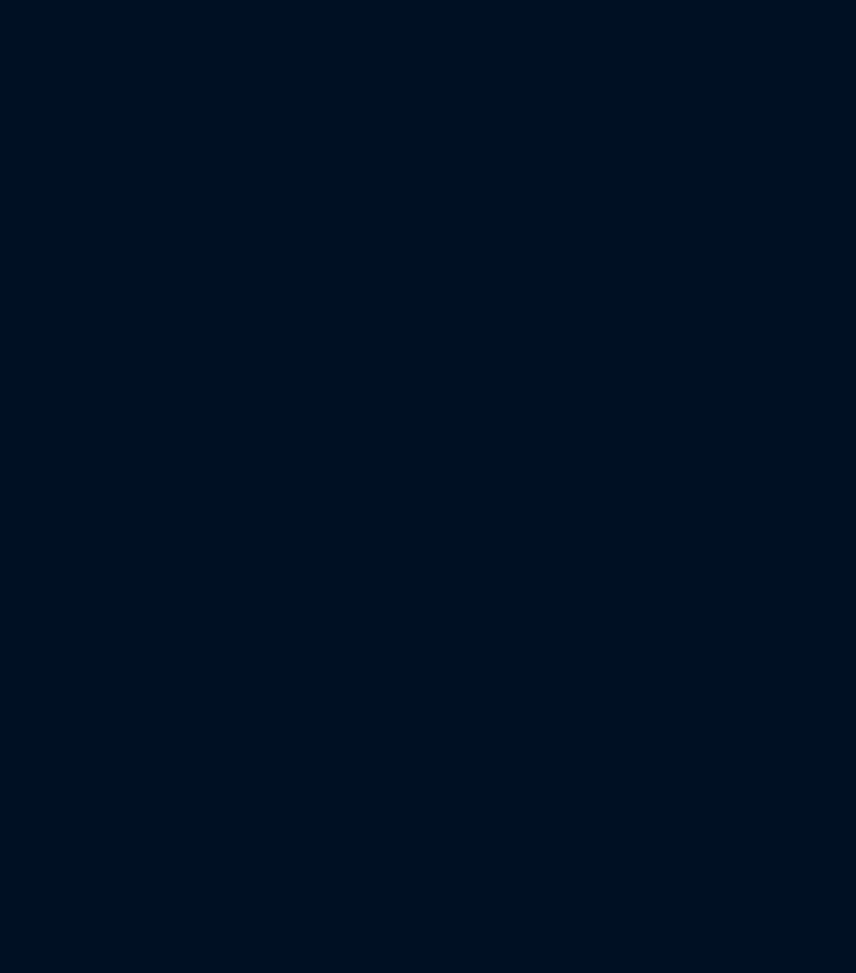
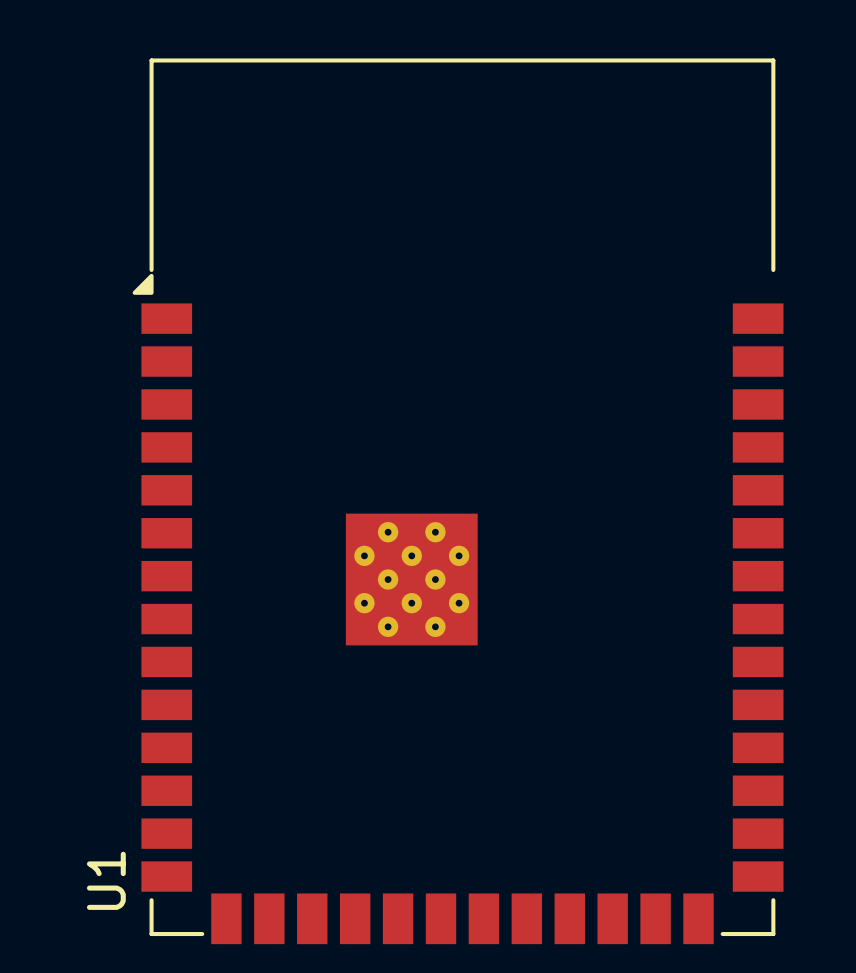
U1: none -> (458, 501)

